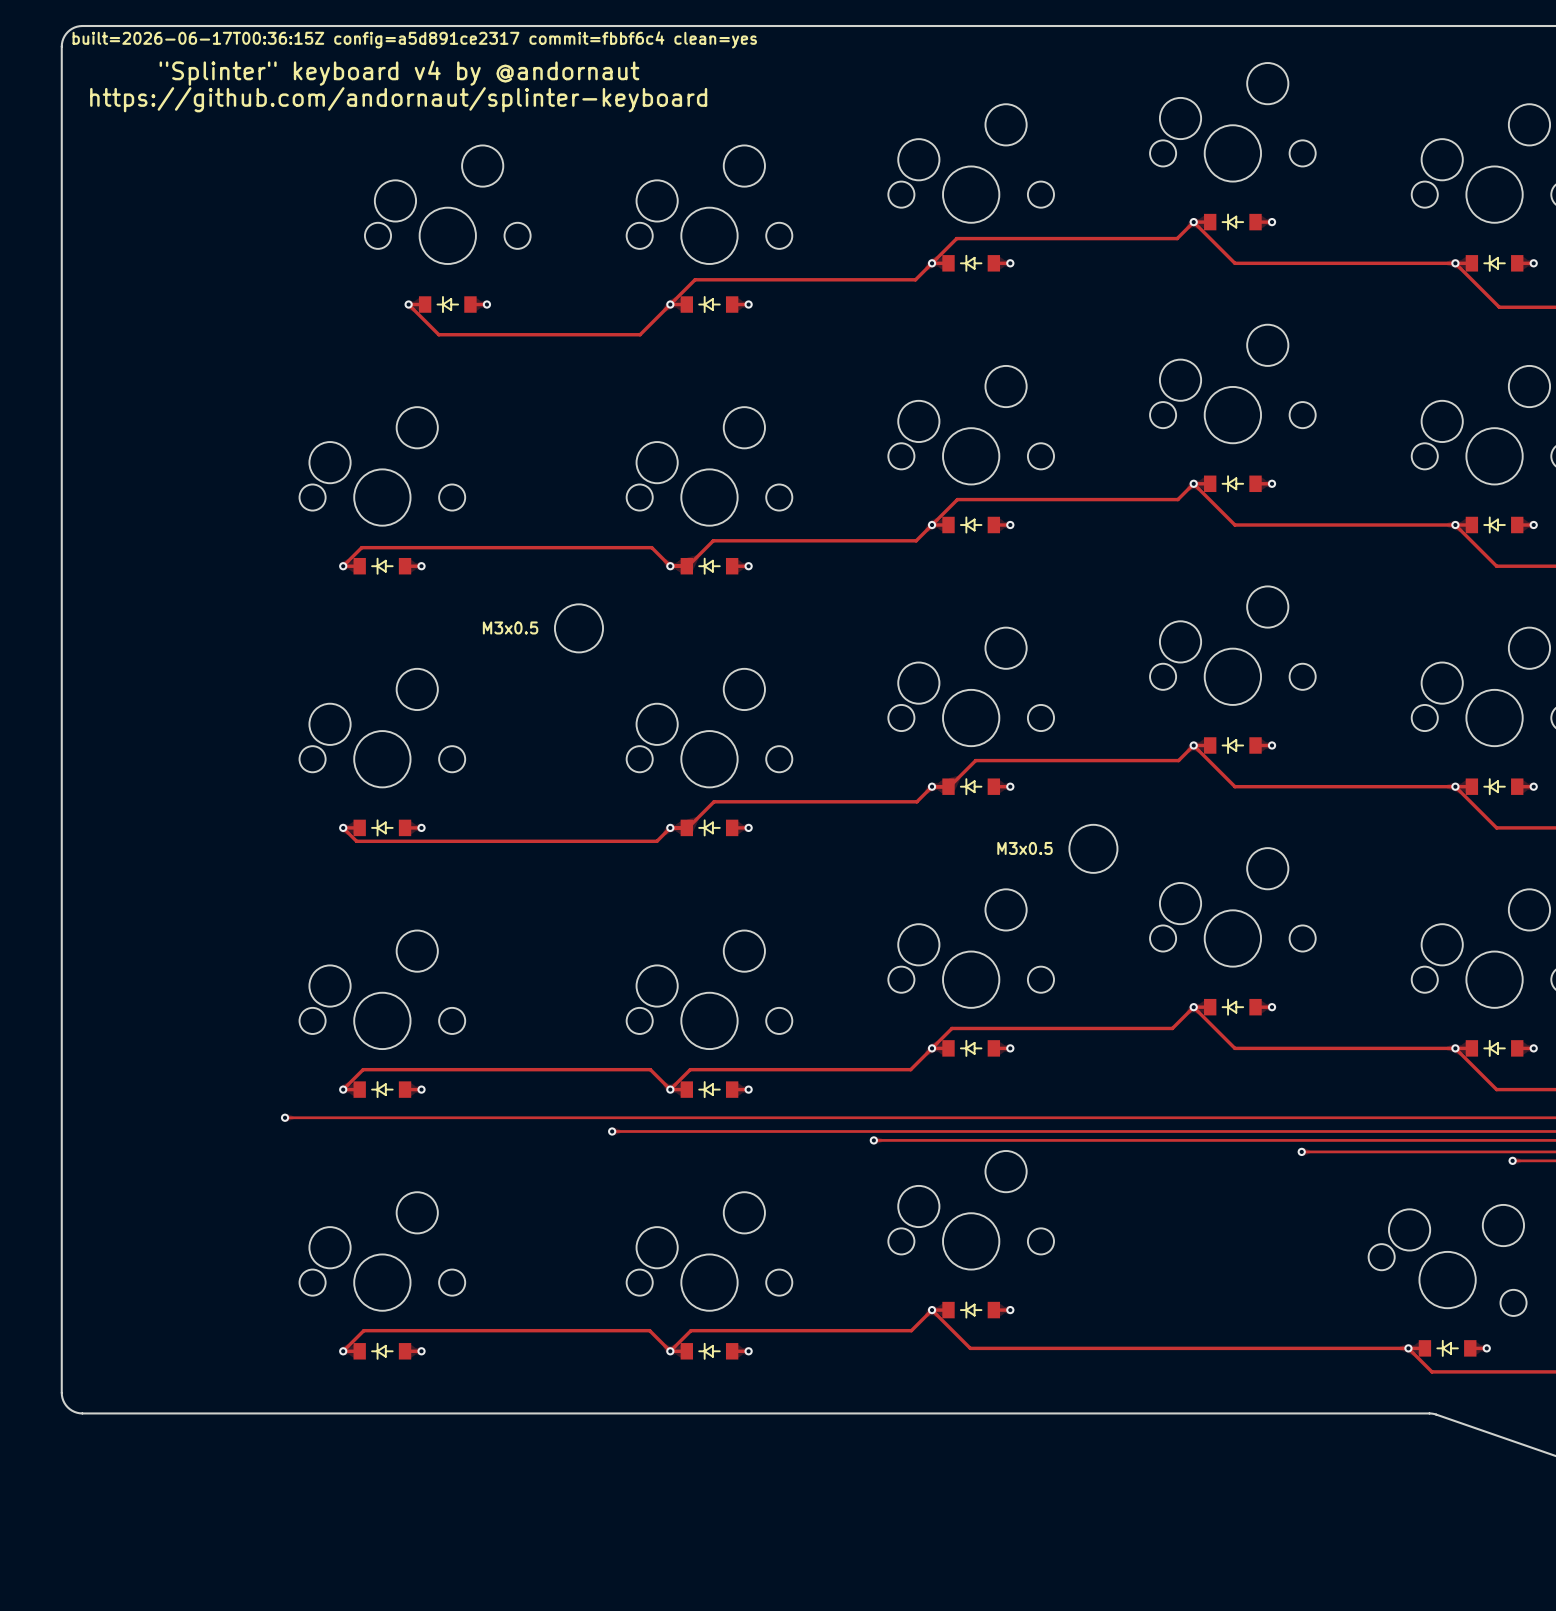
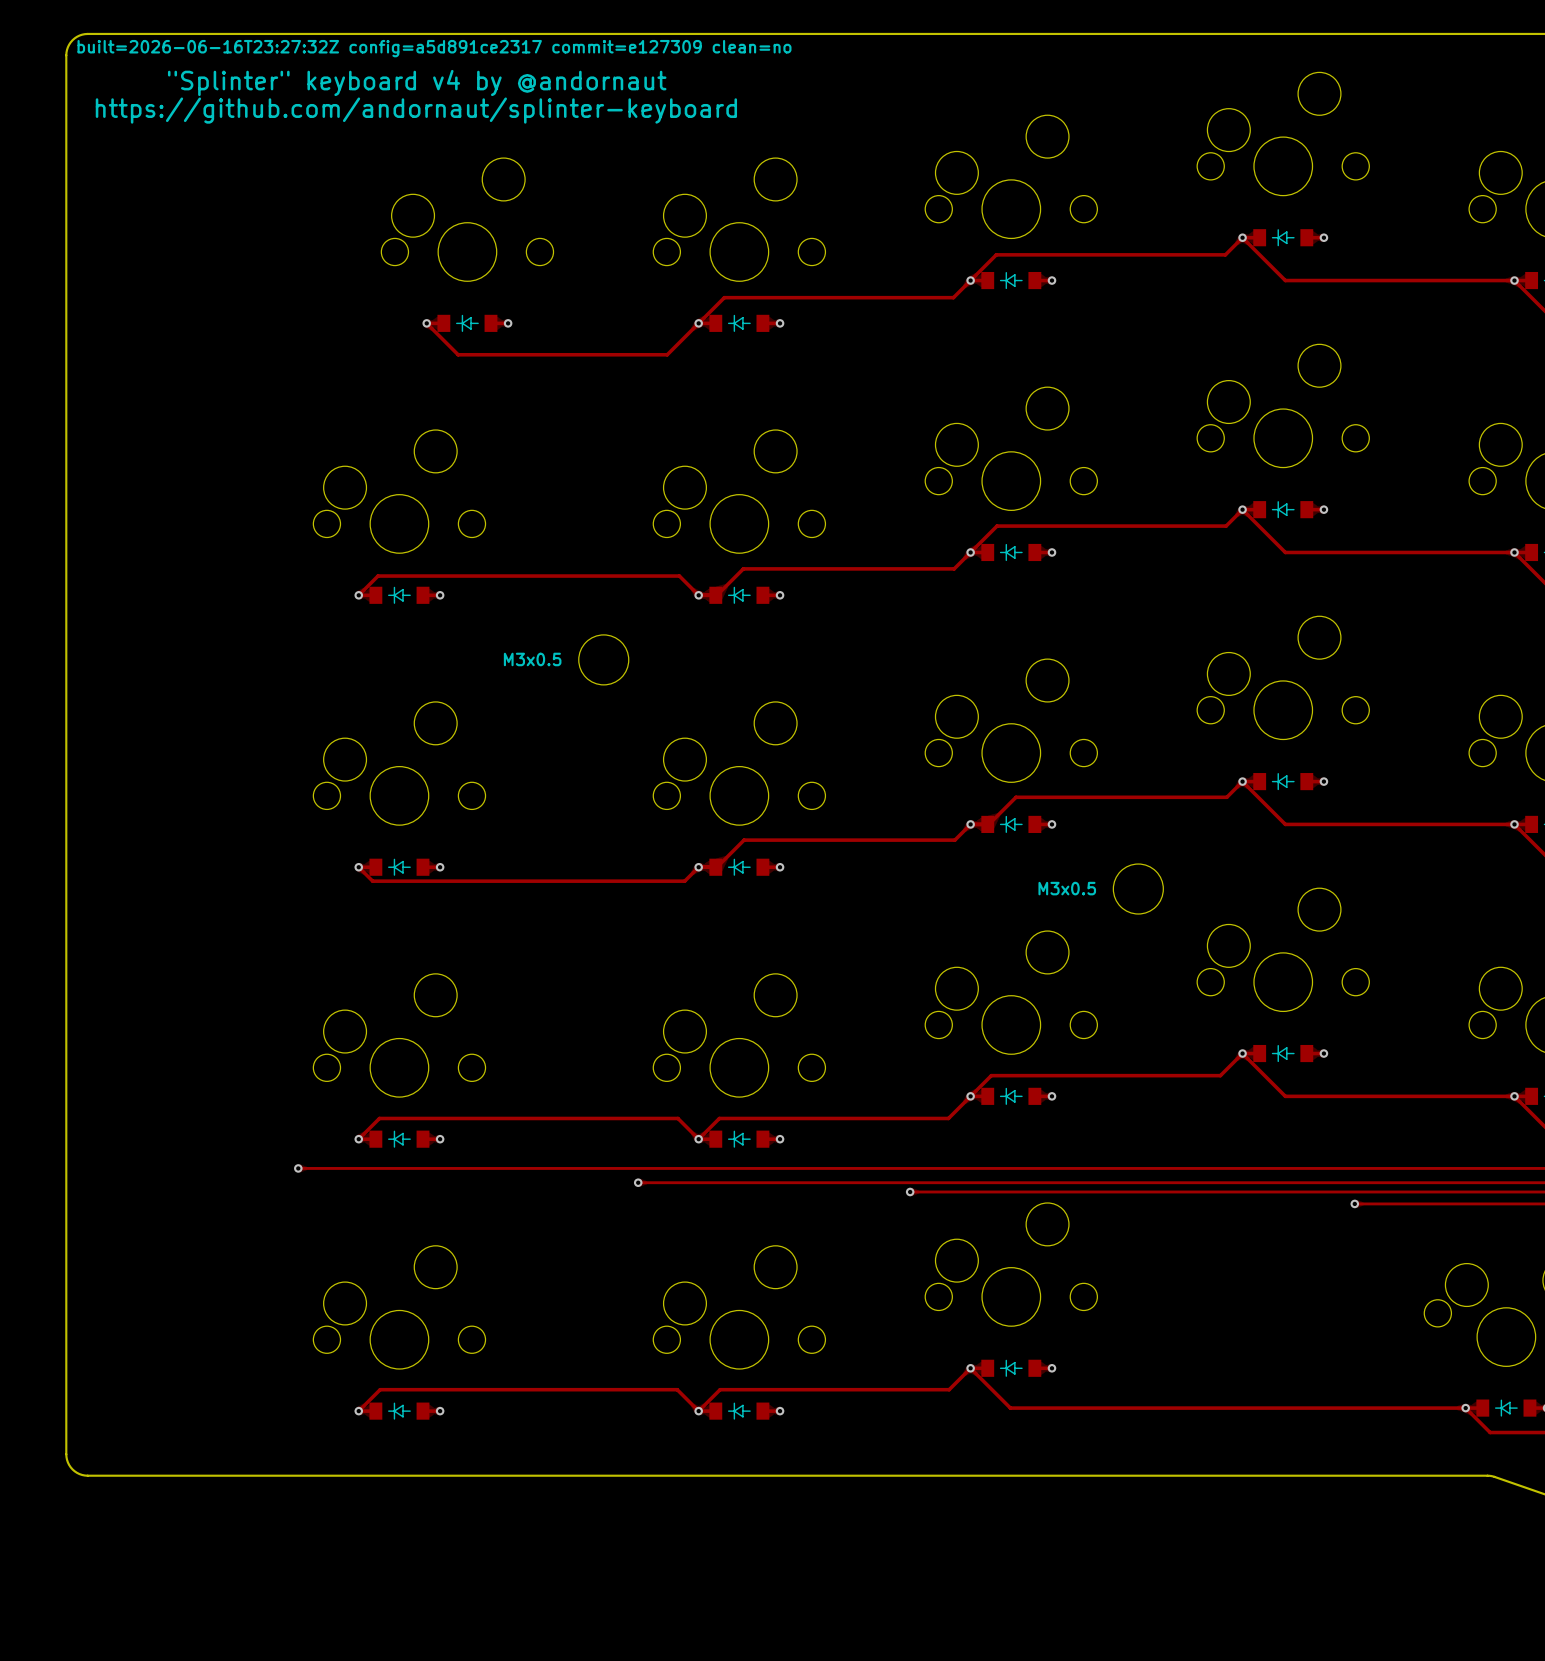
text: built=2026-06-17T00:36:15Z config=a5d891ce2317 commit=fbbf6c4 clean=yes (414, 39) -> built=2026-06-16T23:27:32Z config=a5d891ce2317 commit=e127309 clean=no (434, 48)

